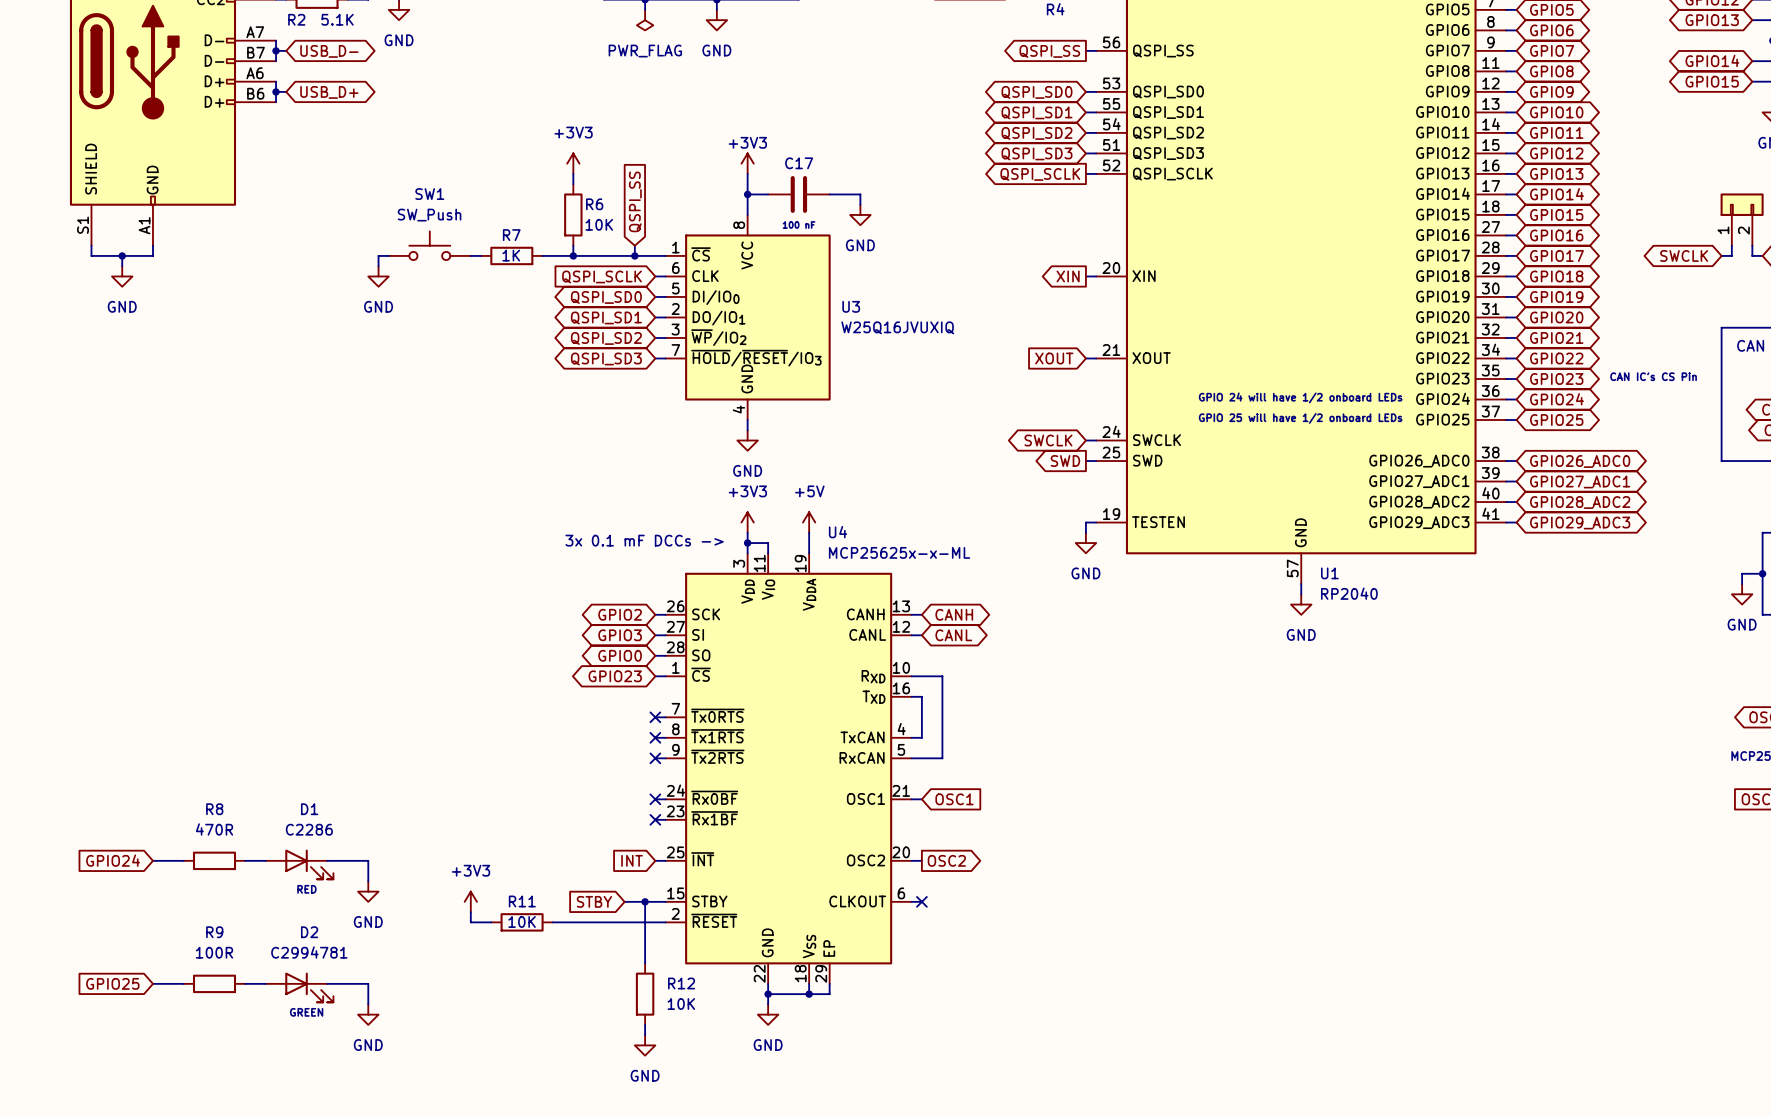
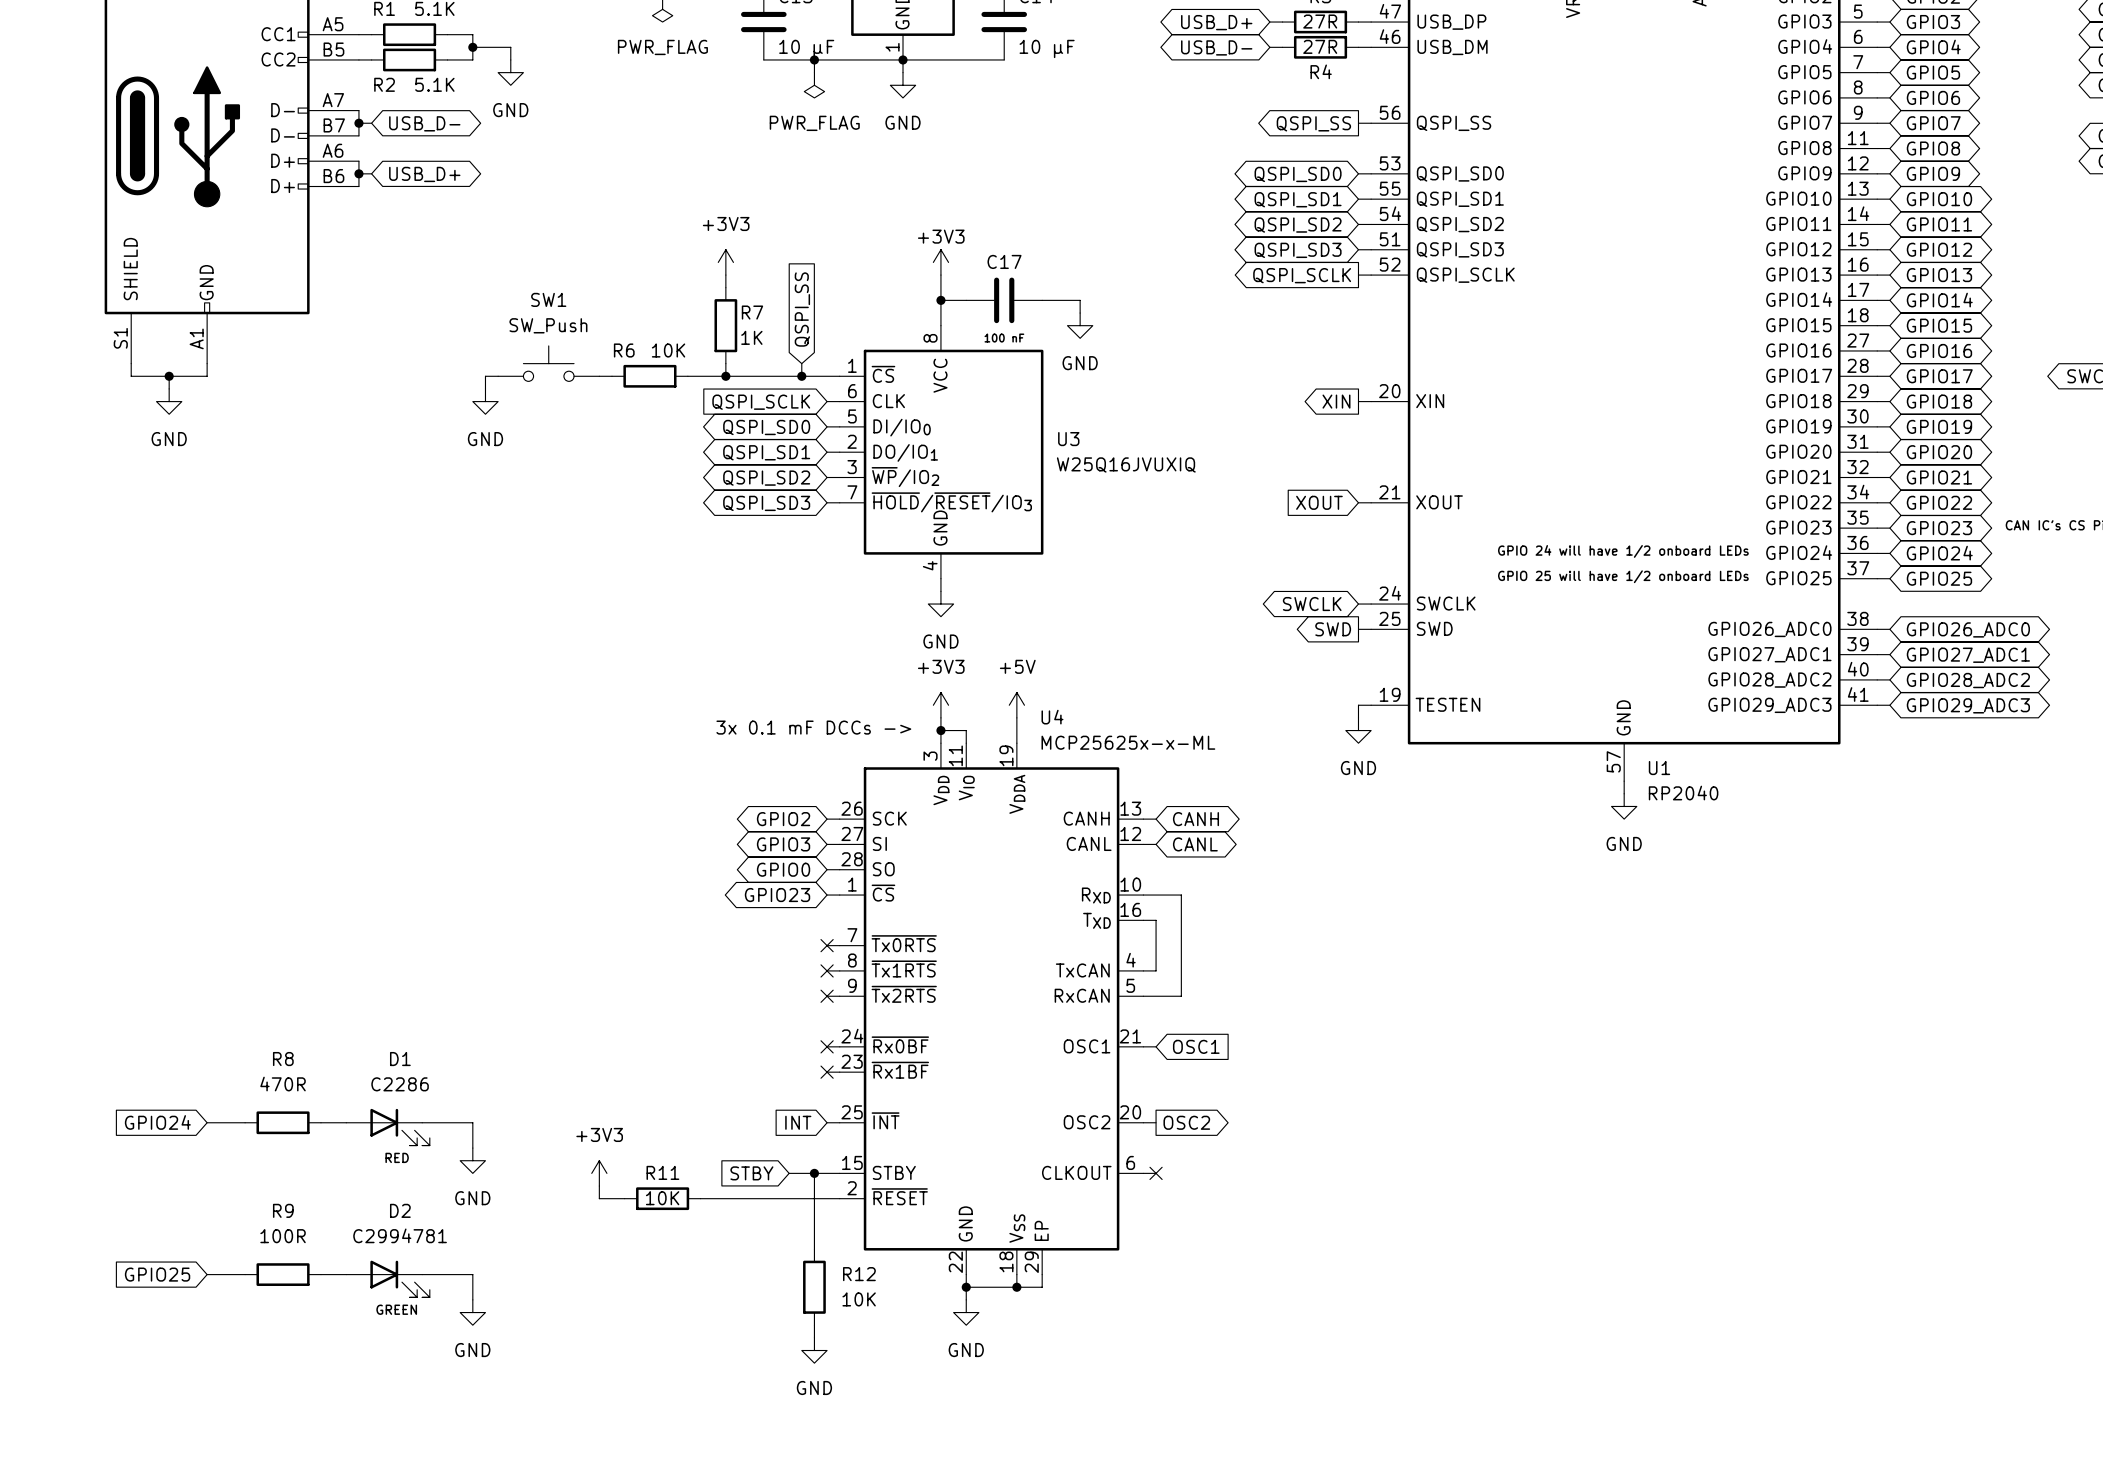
R6 name: R6 (594, 204) -> R7 (752, 312)
R6 value: 10K (599, 224) -> 1K (751, 337)
R7 name: R7 (511, 235) -> R6 (624, 350)
R7 value: 1K (511, 255) -> 10K (668, 350)

